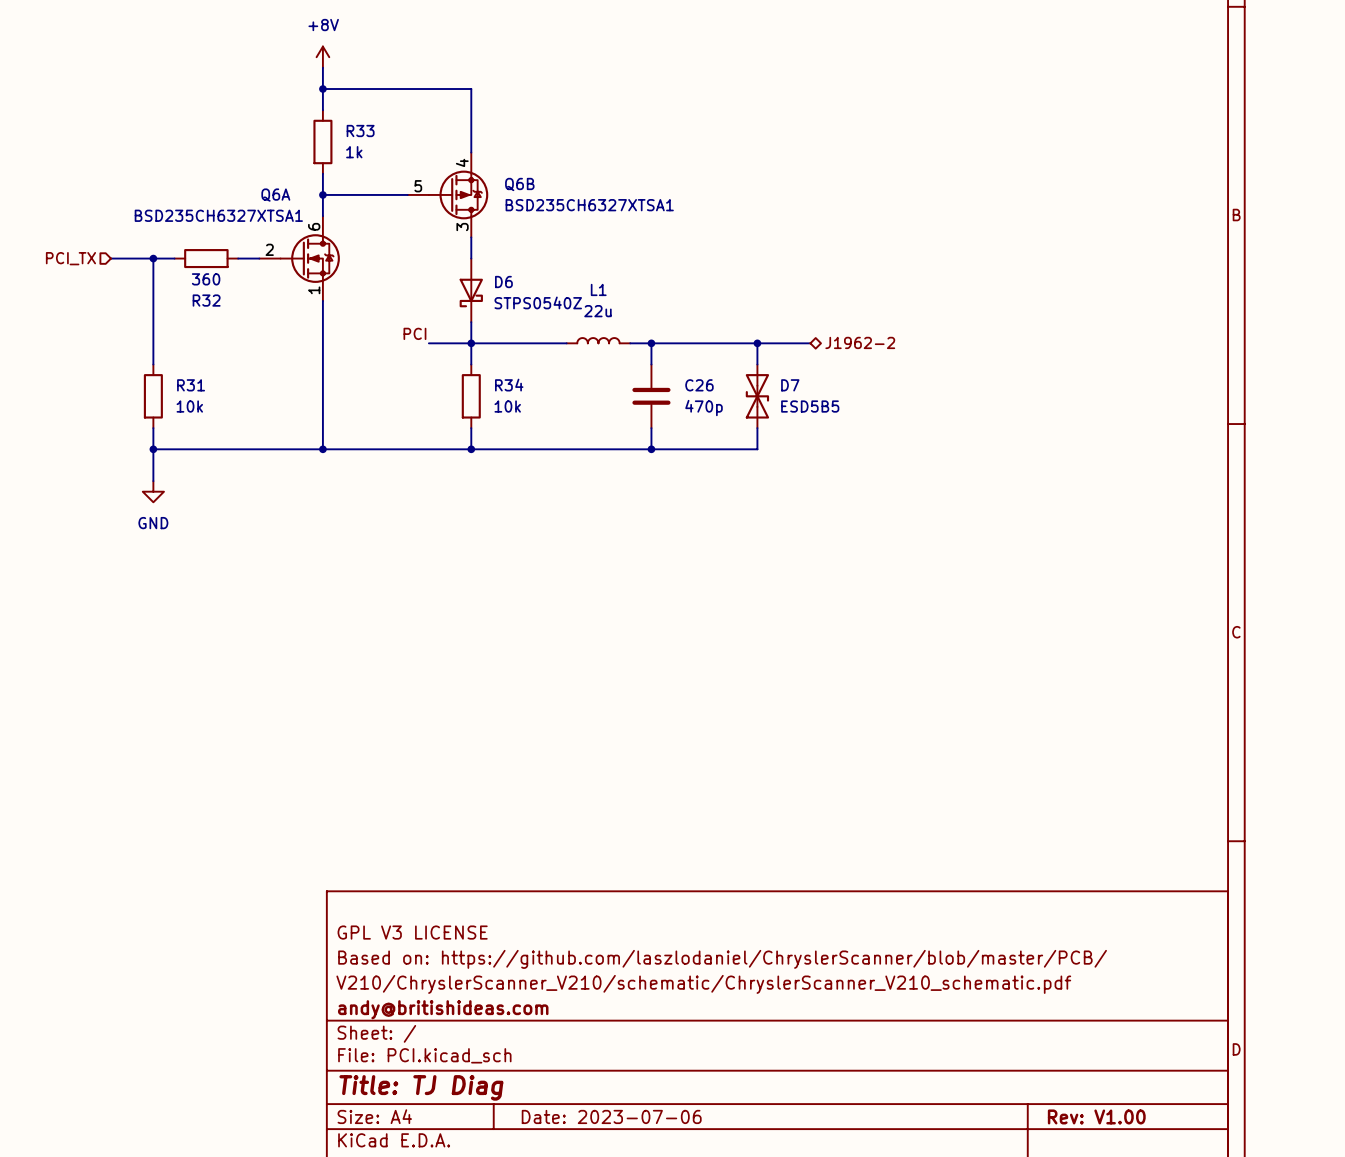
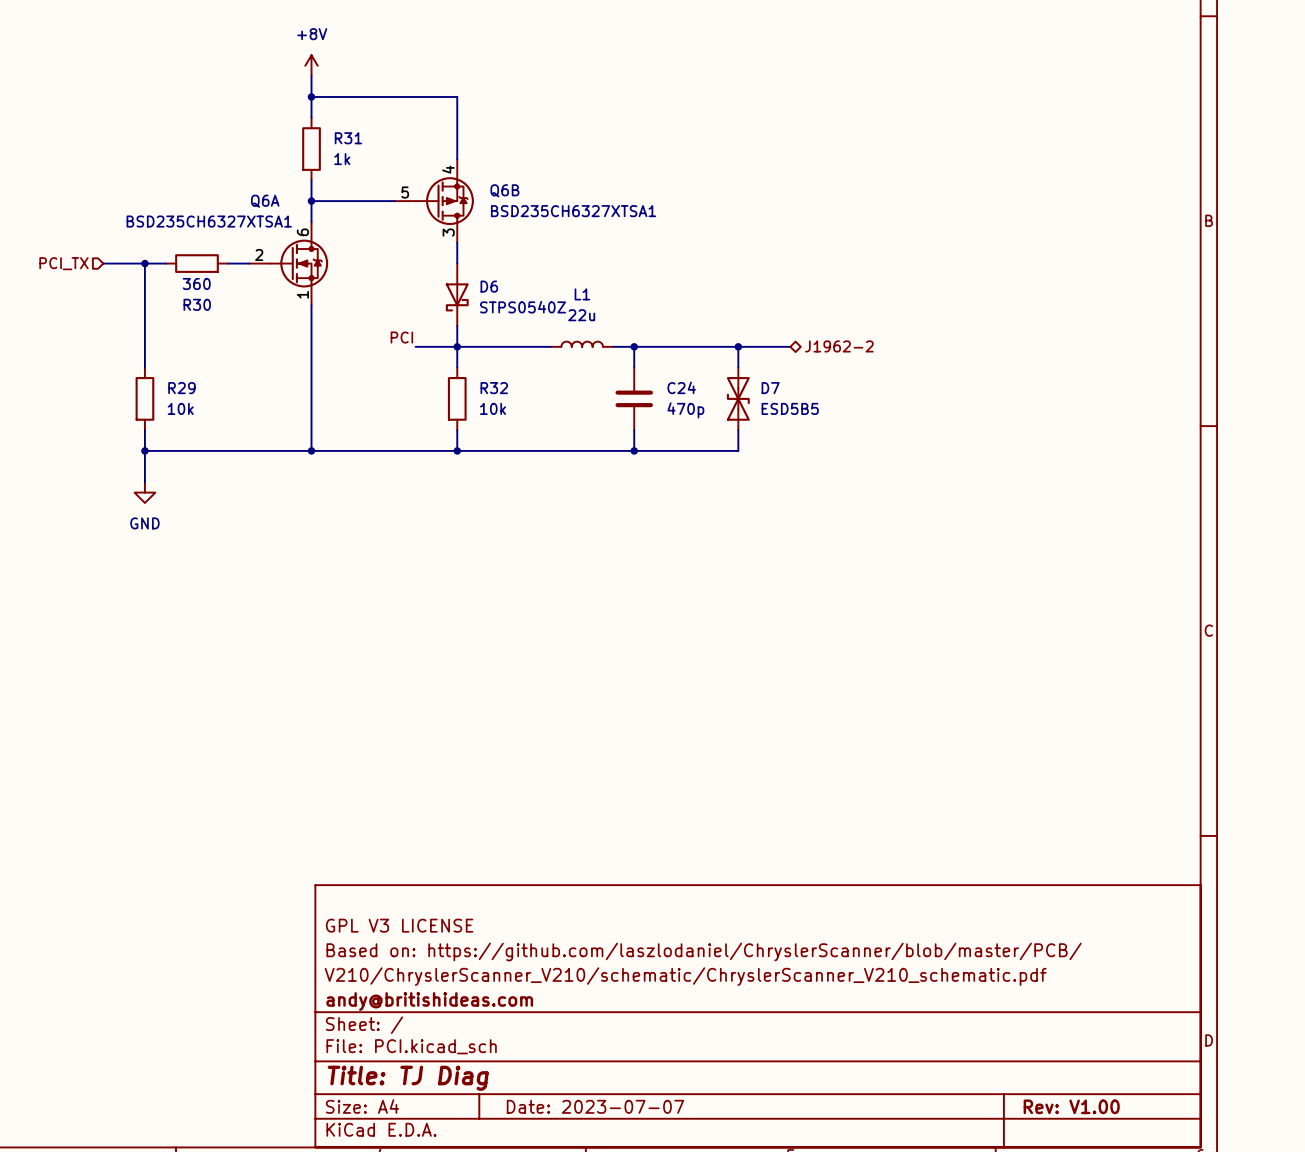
R33 name: R33 (360, 130) -> R31 (348, 138)
R32 name: R32 (206, 300) -> R30 (197, 304)
R31 name: R31 (191, 385) -> R29 (181, 388)
R34 name: R34 (509, 385) -> R32 (494, 388)
C26 name: C26 (699, 385) -> C24 (681, 387)
title block: Date: 2023-07-06 (611, 1116) -> Date: 2023-07-07 (595, 1106)

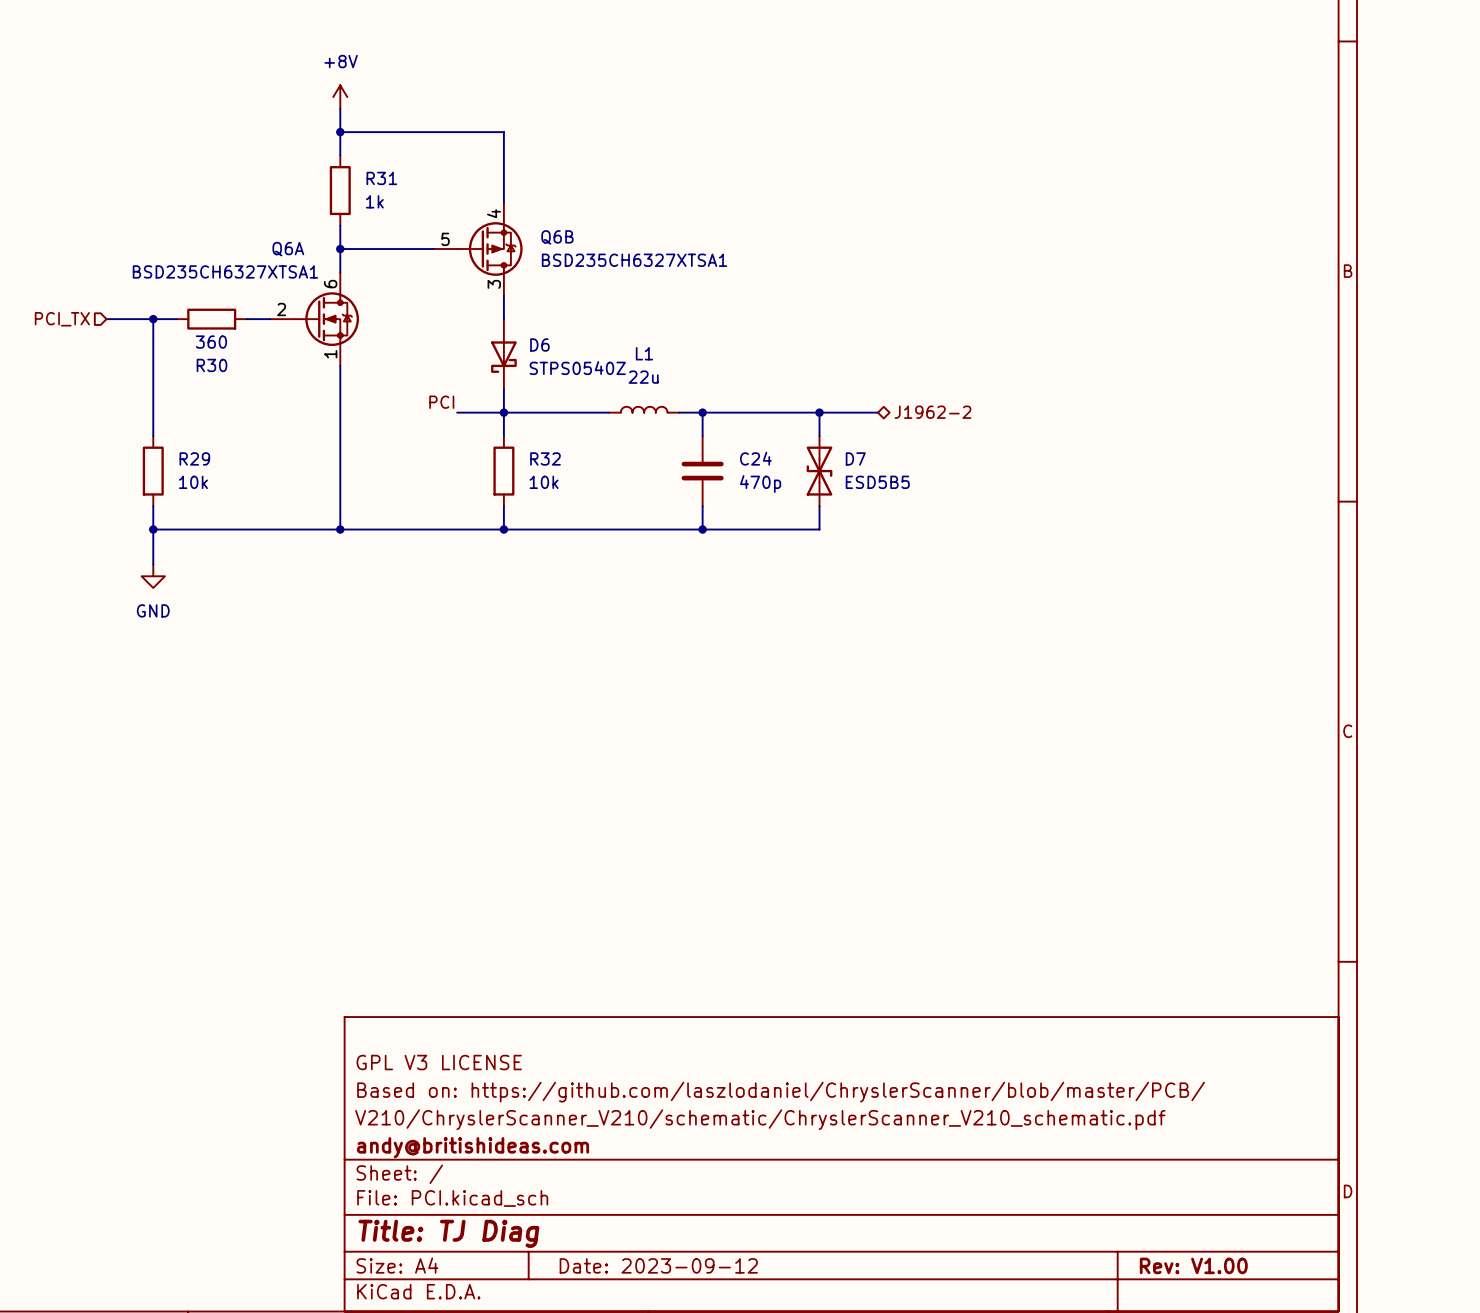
title block: Date: 2023-07-07 (595, 1106) -> Date: 2023-09-12 (658, 1265)

